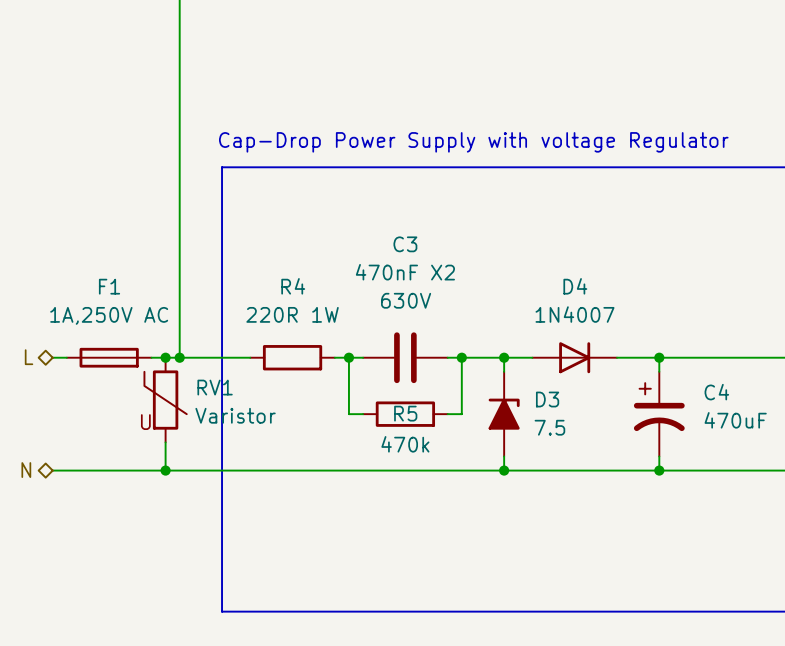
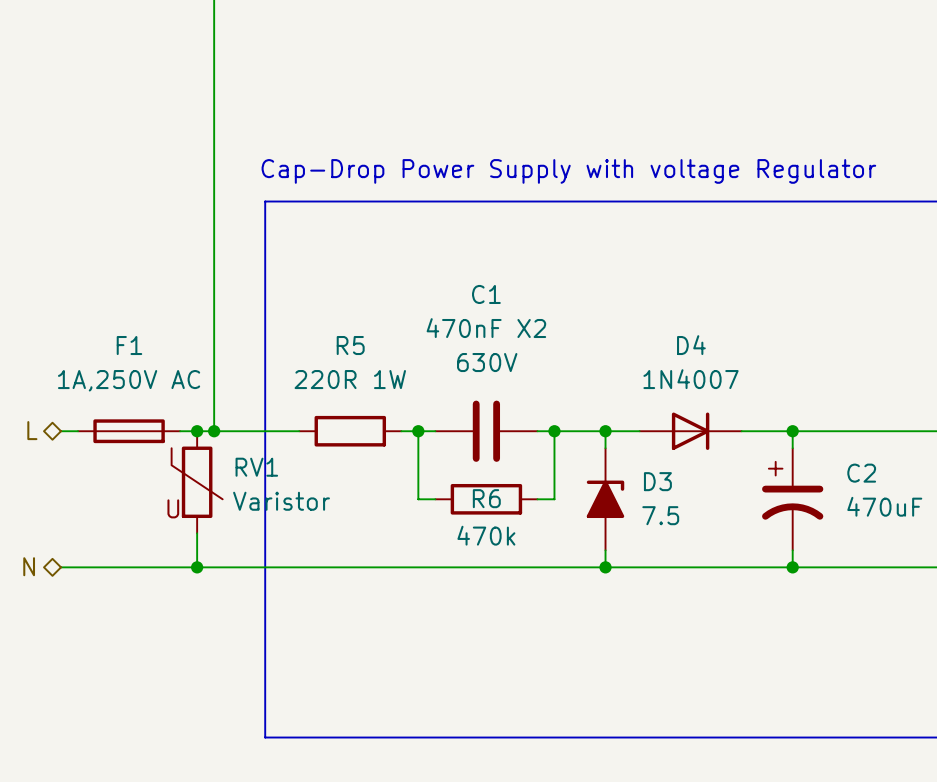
C3 name: C3 (405, 244) -> C1 (486, 294)
R4 name: R4 (293, 286) -> R5 (350, 345)
C4 name: C4 (716, 392) -> C2 (861, 473)
R5 name: R5 (405, 413) -> R6 (486, 498)

